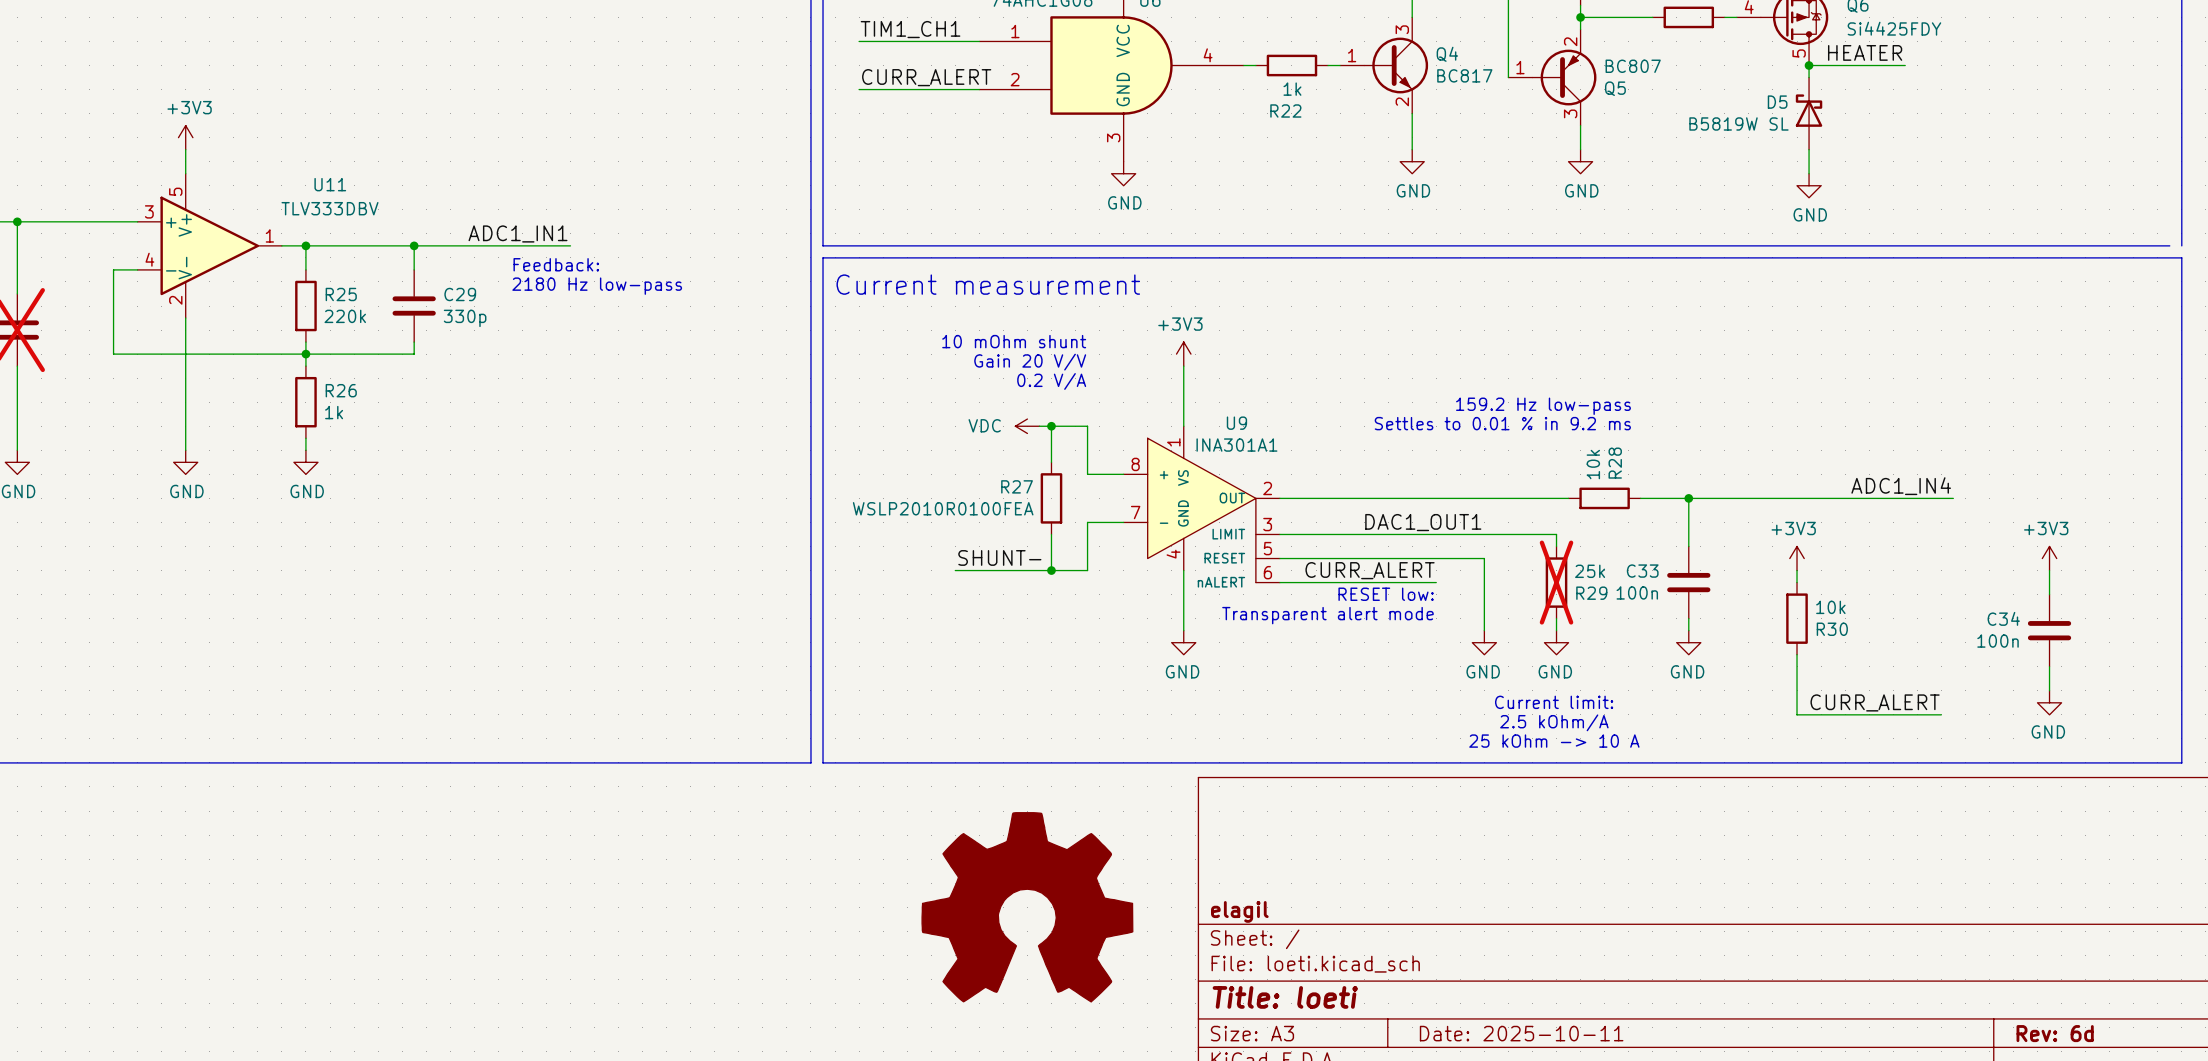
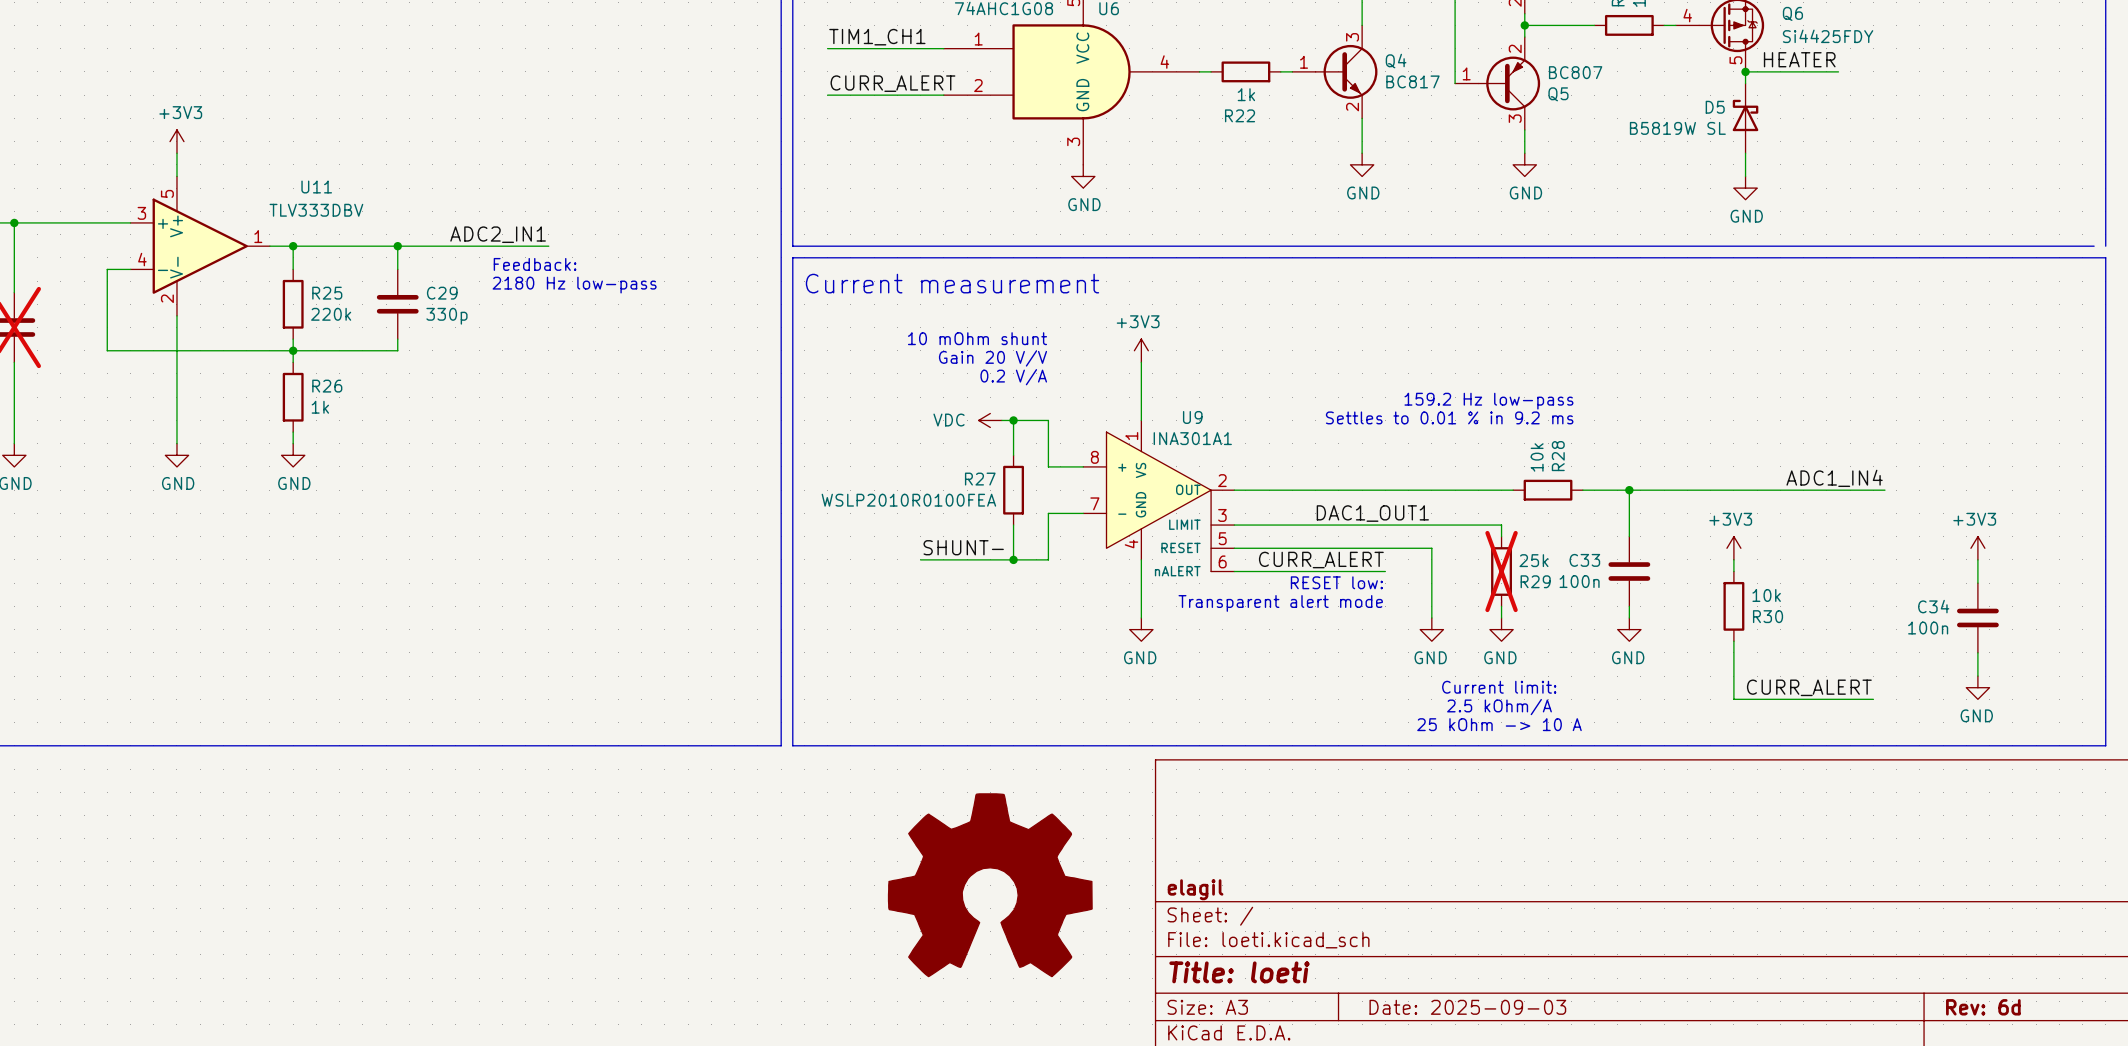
label: ADC1_IN1 (518, 233) -> ADC2_IN1 (498, 234)
title block: Date: 2025-10-11 (1521, 1033) -> Date: 2025-09-03 (1467, 1007)

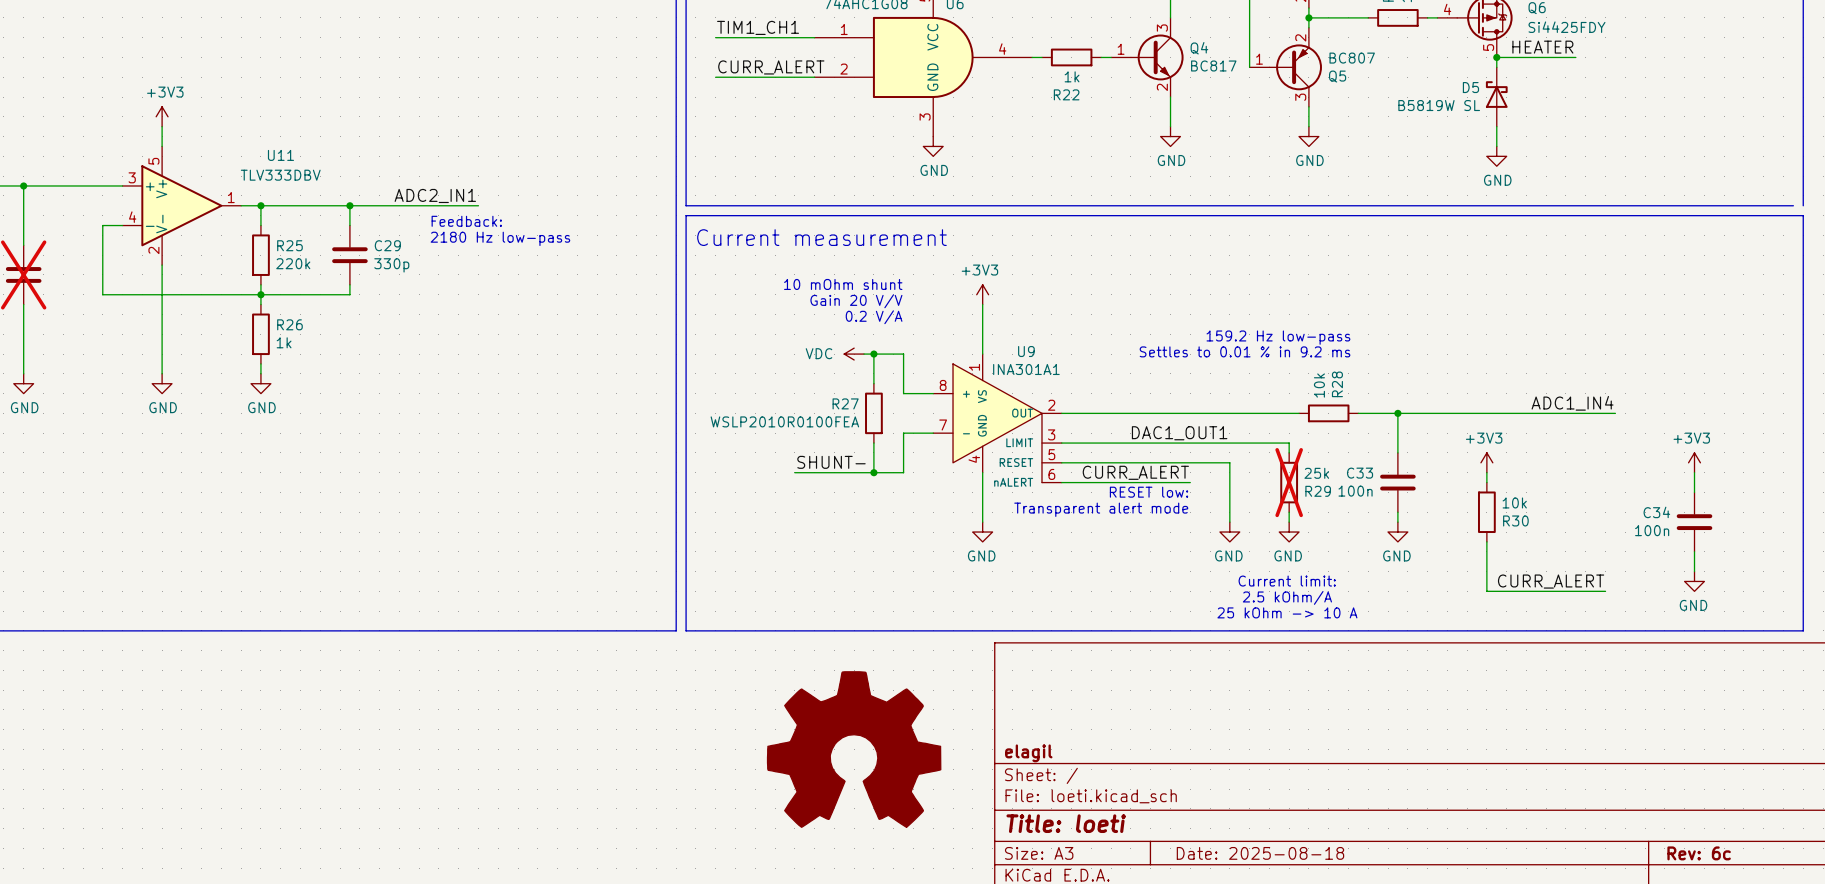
title block: Date: 2025-09-03 (1467, 1007) -> Date: 2025-08-18 (1260, 853)
title block: Rev: 6d (1983, 1007) -> Rev: 6c (1699, 853)

